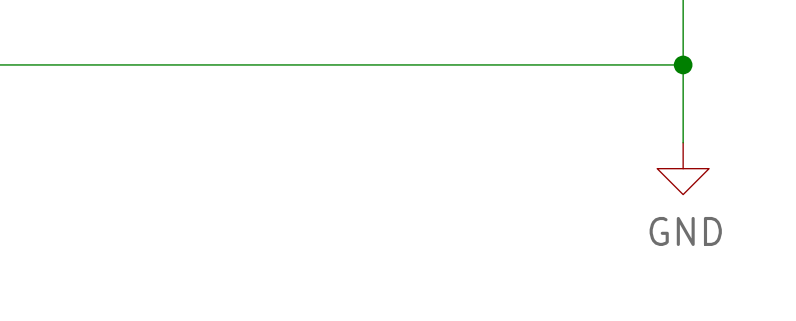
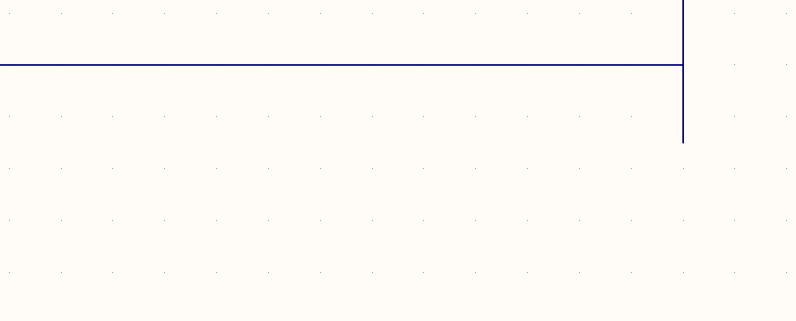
junction: (683, 64) -> none
power symbol: GND (683, 168) -> none

